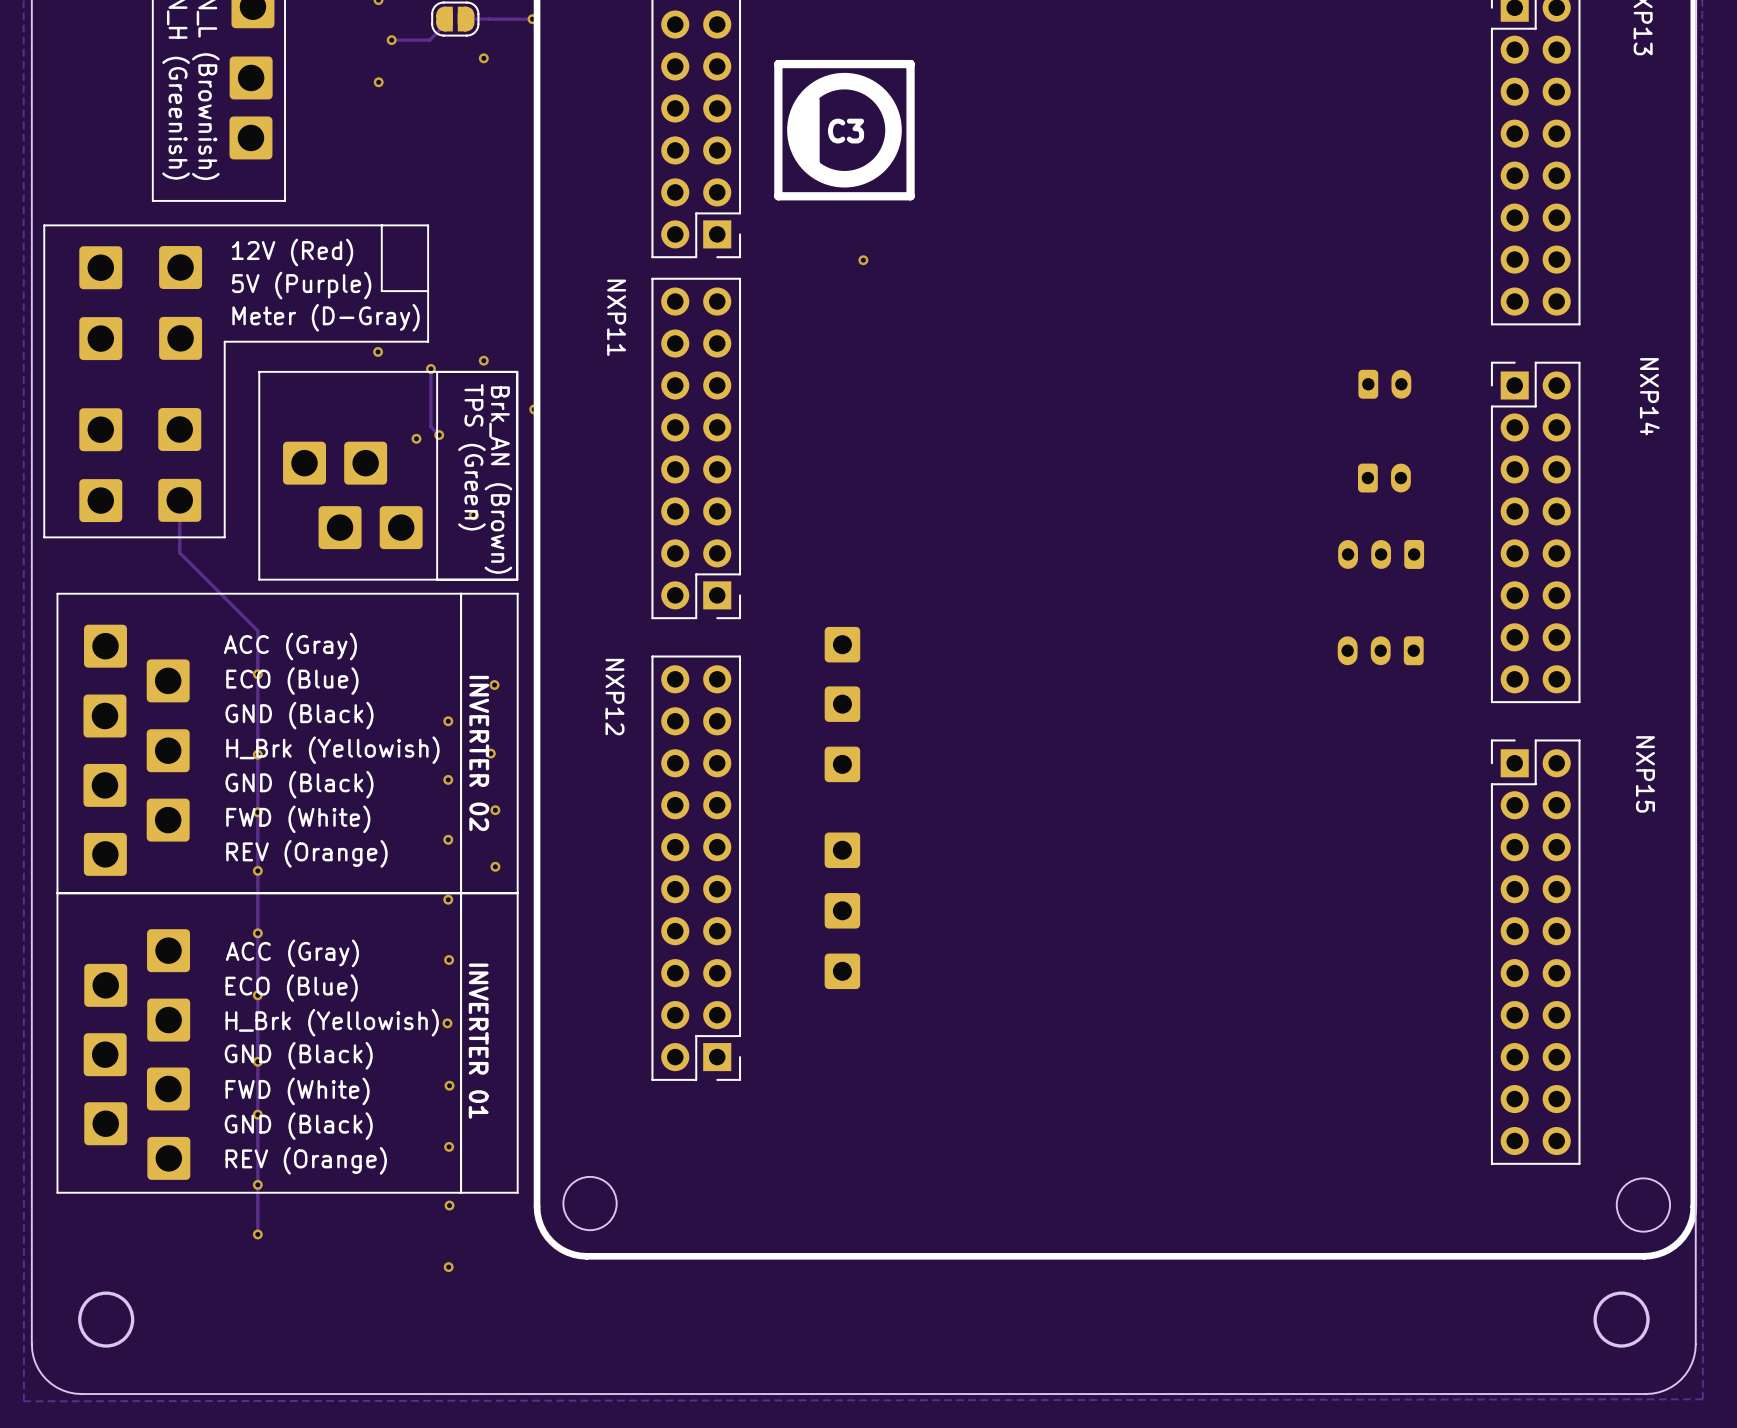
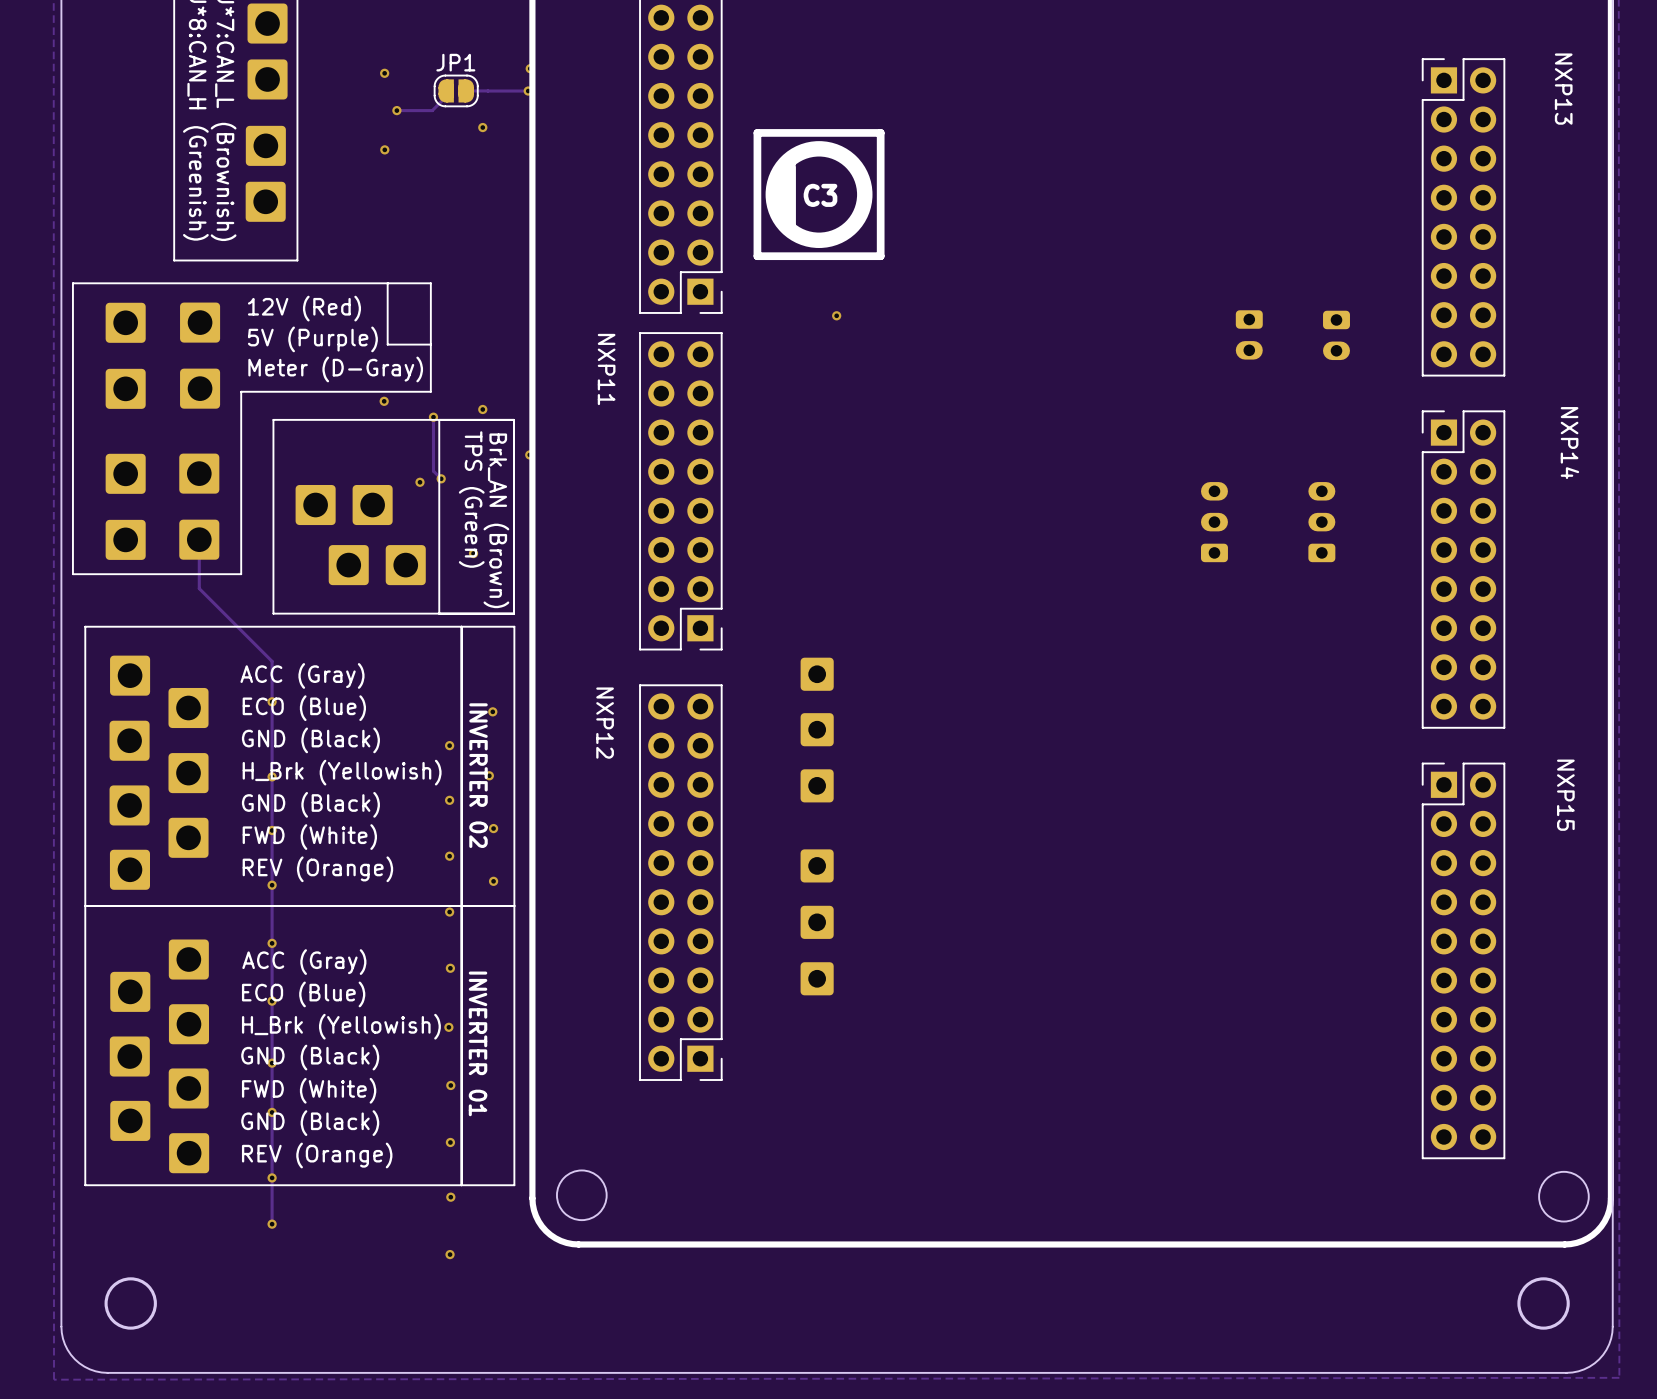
part: none -> (1249, 334)
part: none -> (1336, 335)
part: (1384, 384) -> none
part footprint: [1357, 463, 1411, 493] -> [1308, 482, 1336, 563]
part: none -> (1214, 522)
part: (1381, 554) -> none
part: (1380, 650) -> none

